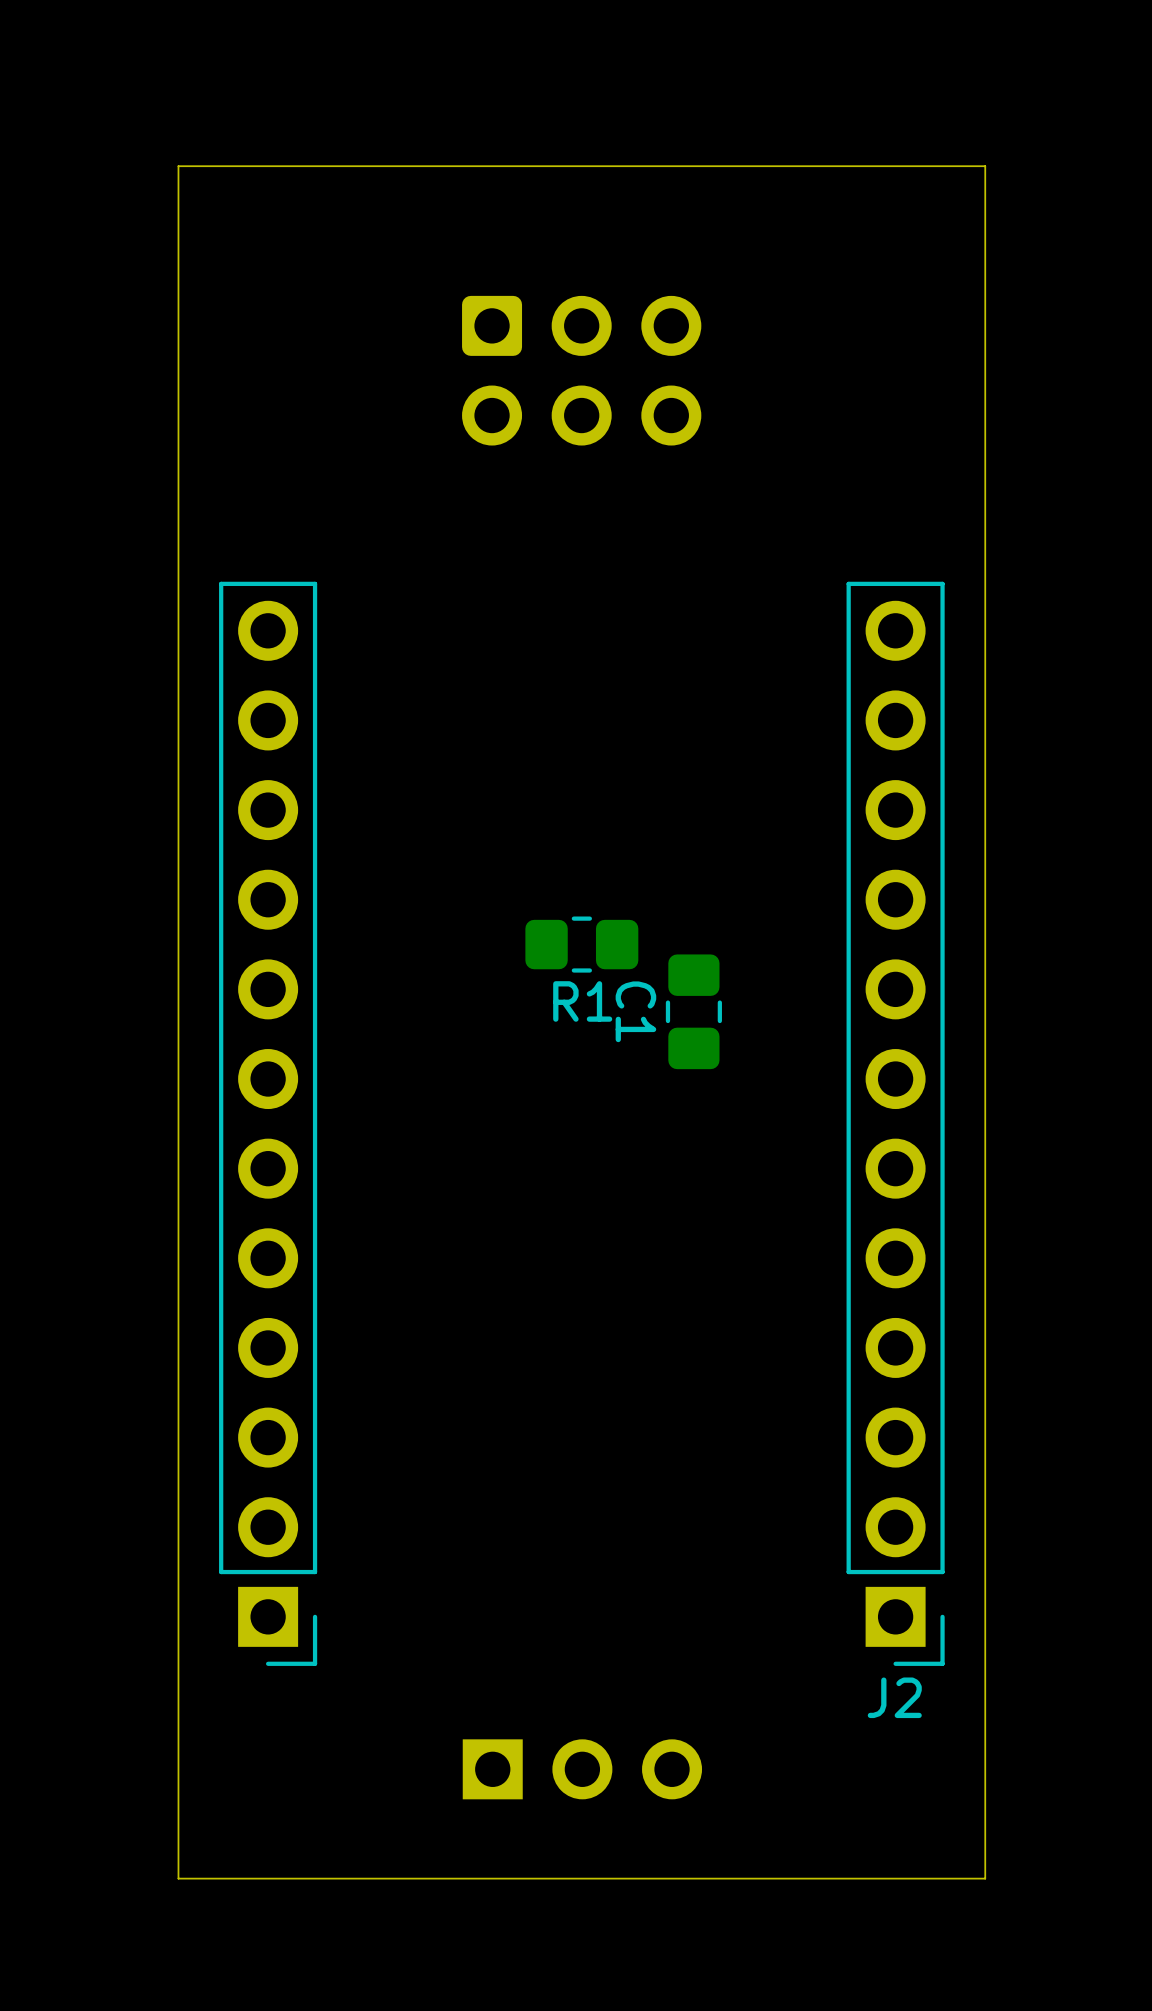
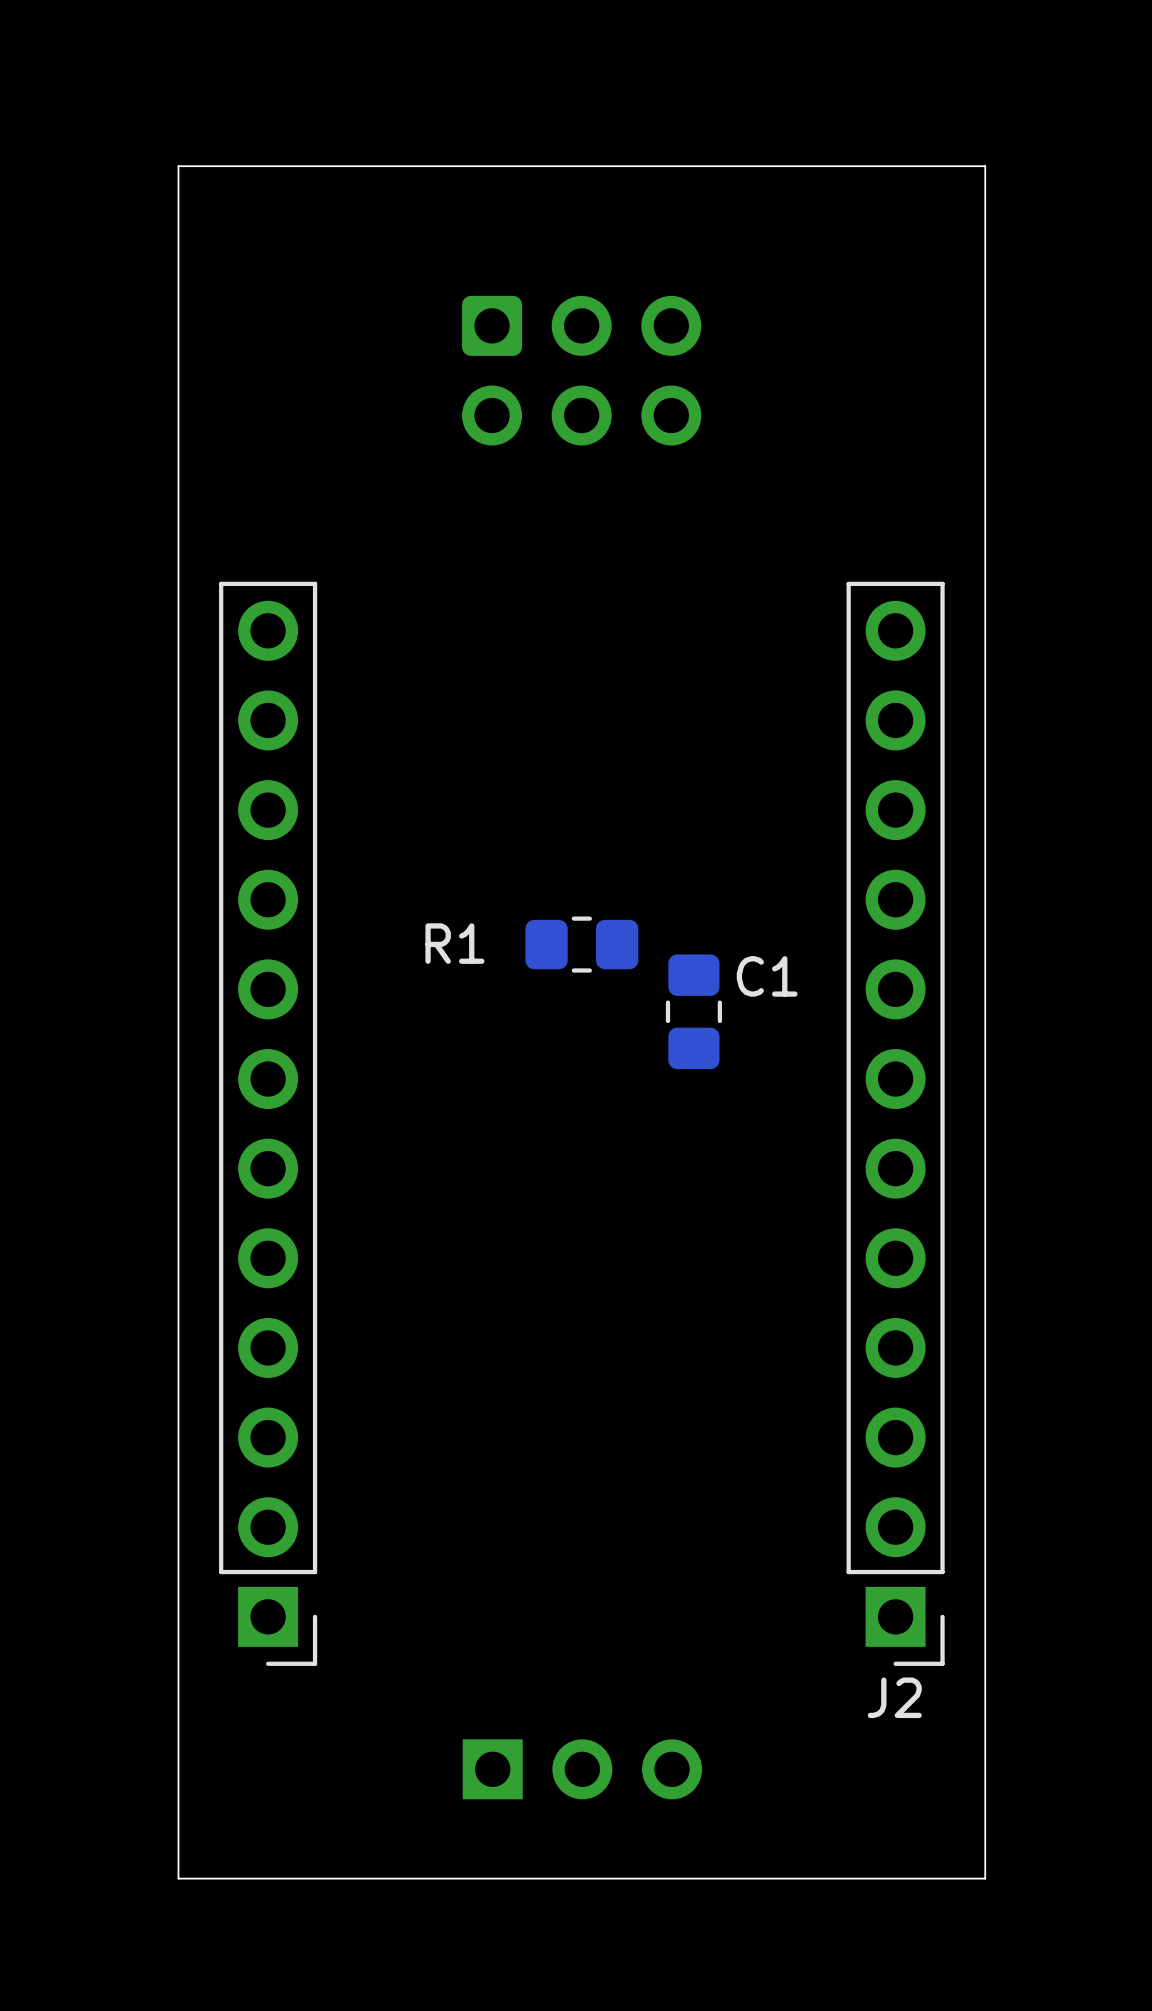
R1 name position: R1 (582, 1001) -> R1 (454, 943)
C1 name rotation: 0° (635, 1011) -> 90° counterclockwise (767, 976)
C1 name position: C1 (635, 1011) -> C1 (767, 976)

